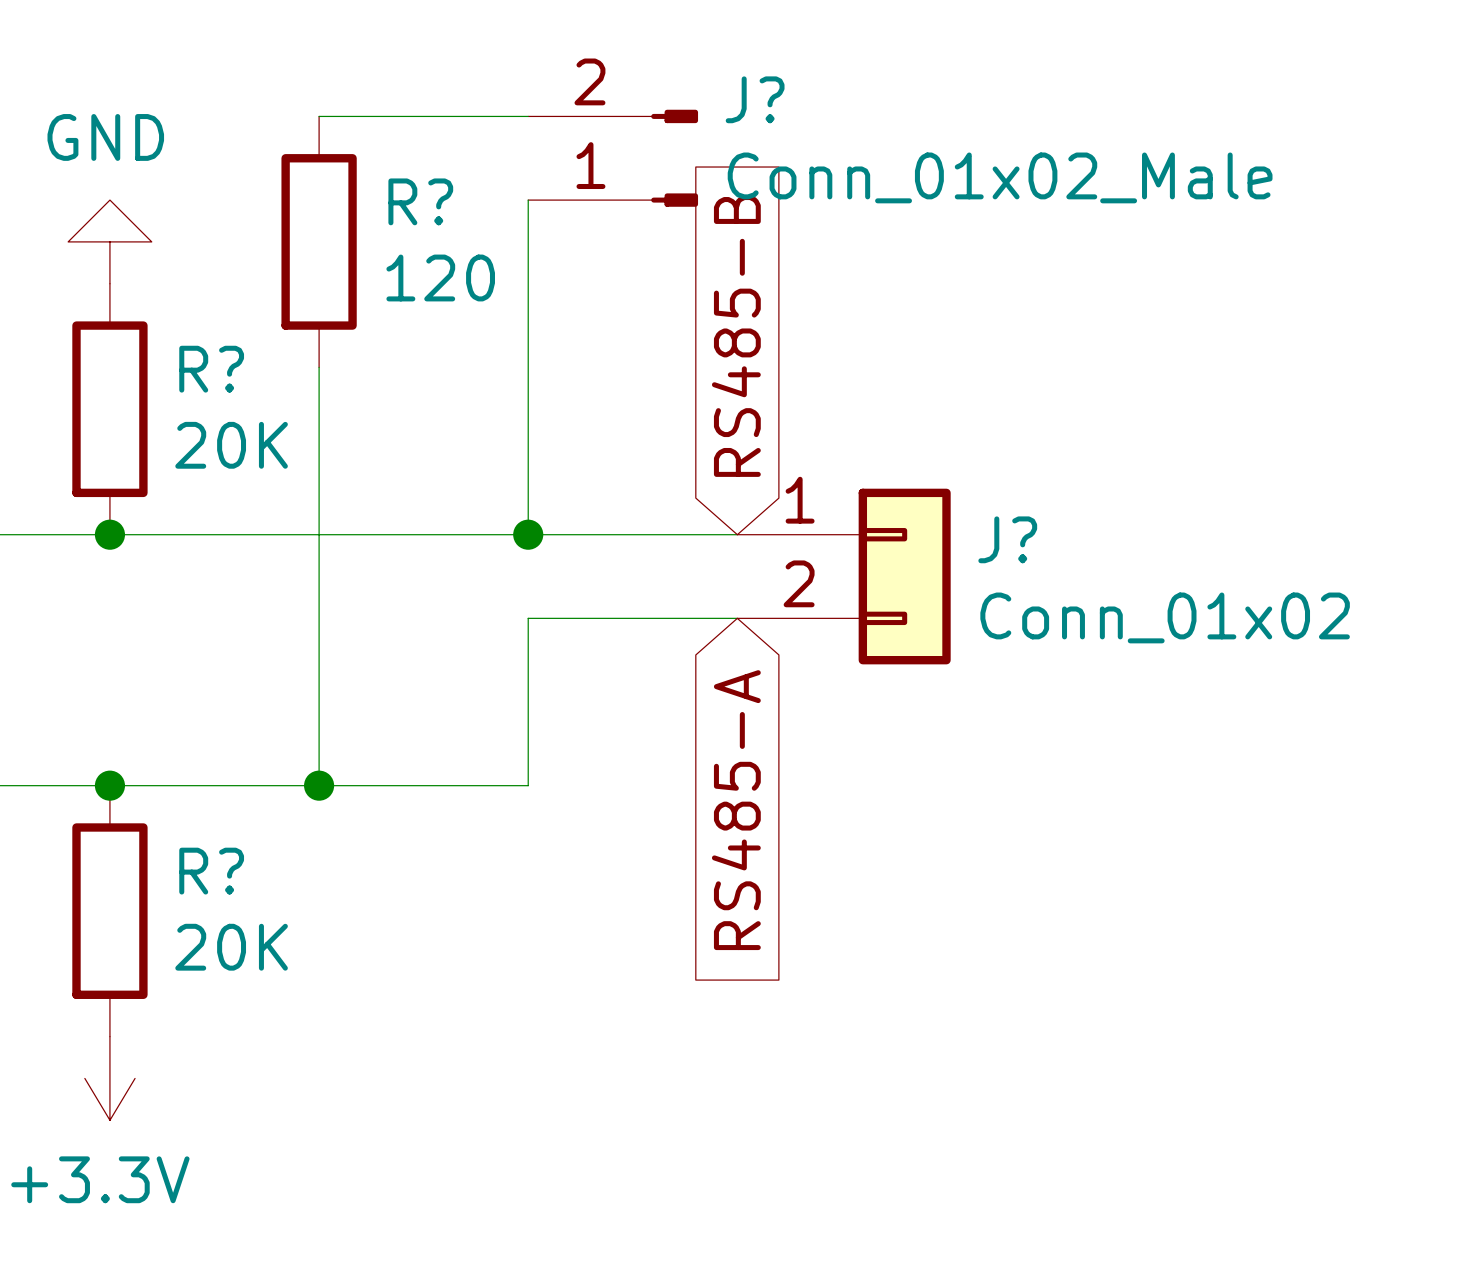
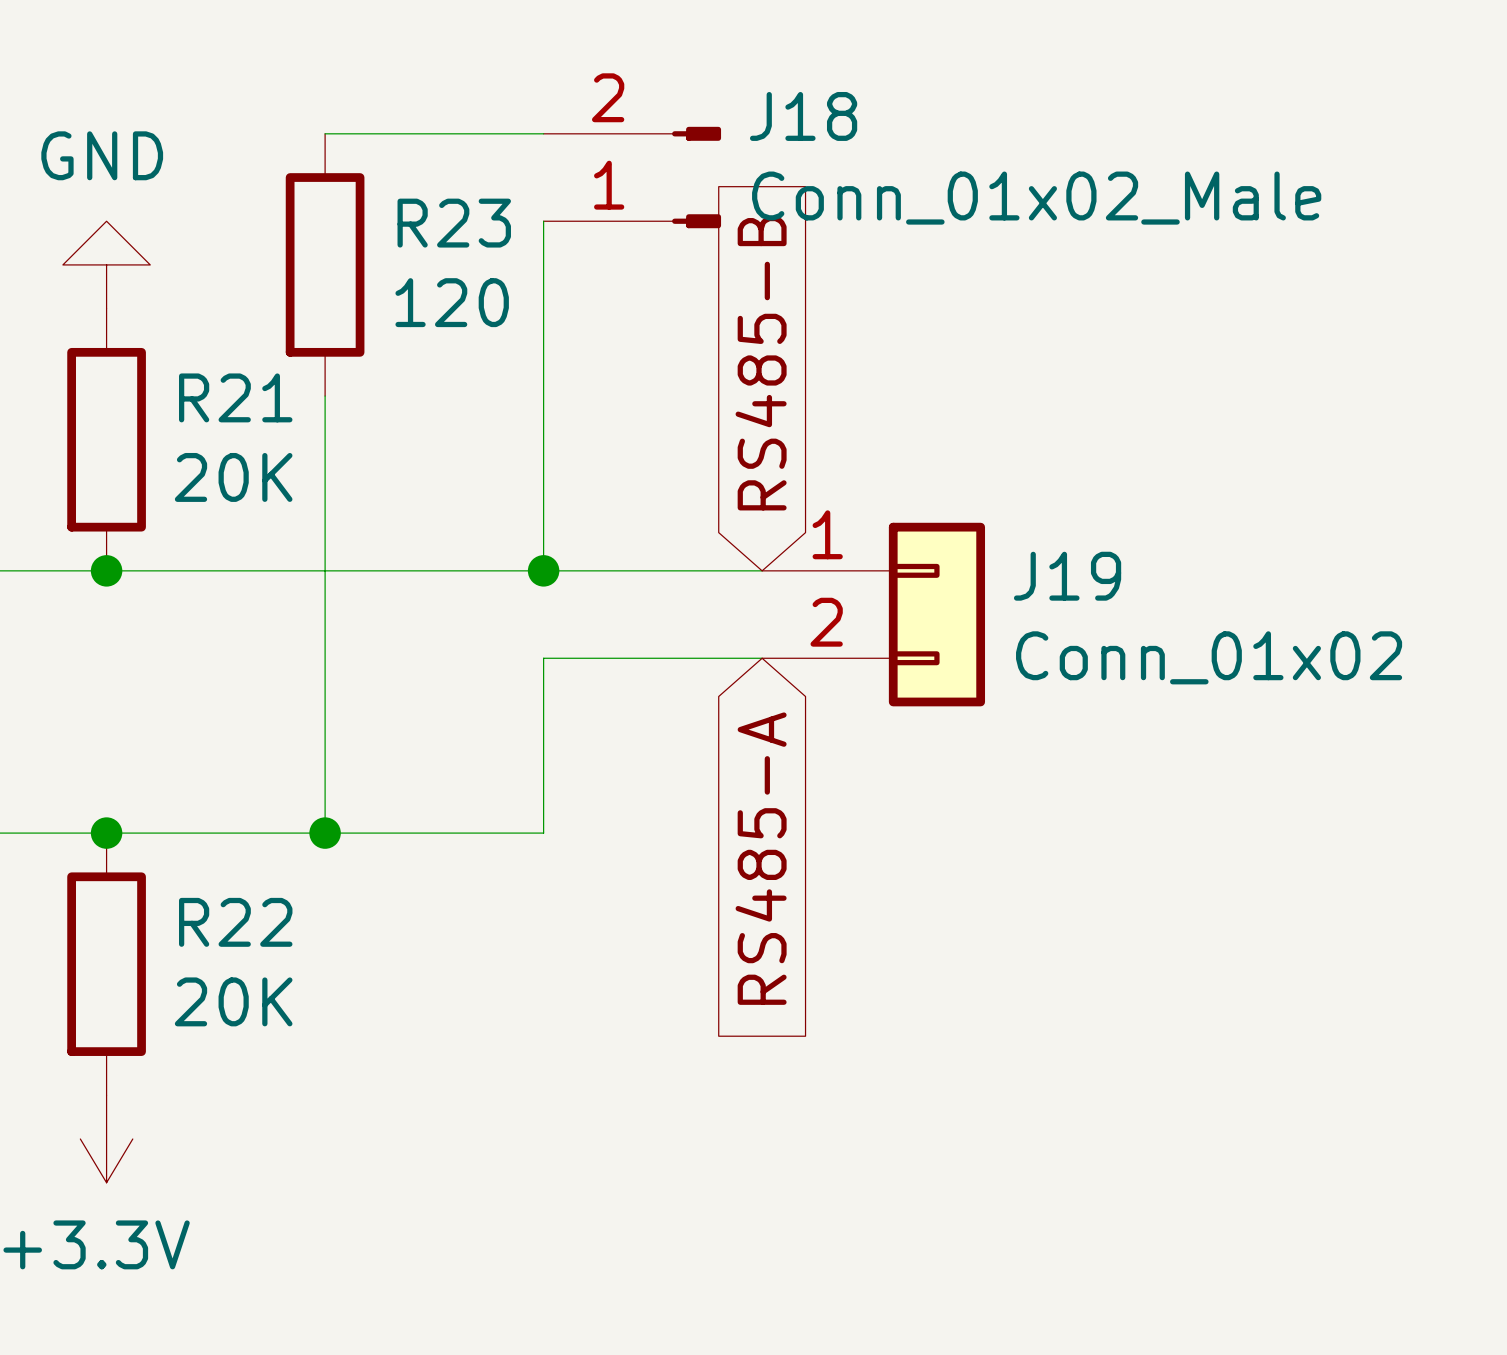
J? name: J? (755, 99) -> J18 (803, 116)
R? name: R? (420, 201) -> R23 (454, 223)
R? name: R? (211, 369) -> R21 (235, 397)
J? name: J? (1007, 539) -> J19 (1067, 576)
R? name: R? (211, 871) -> R22 (235, 922)

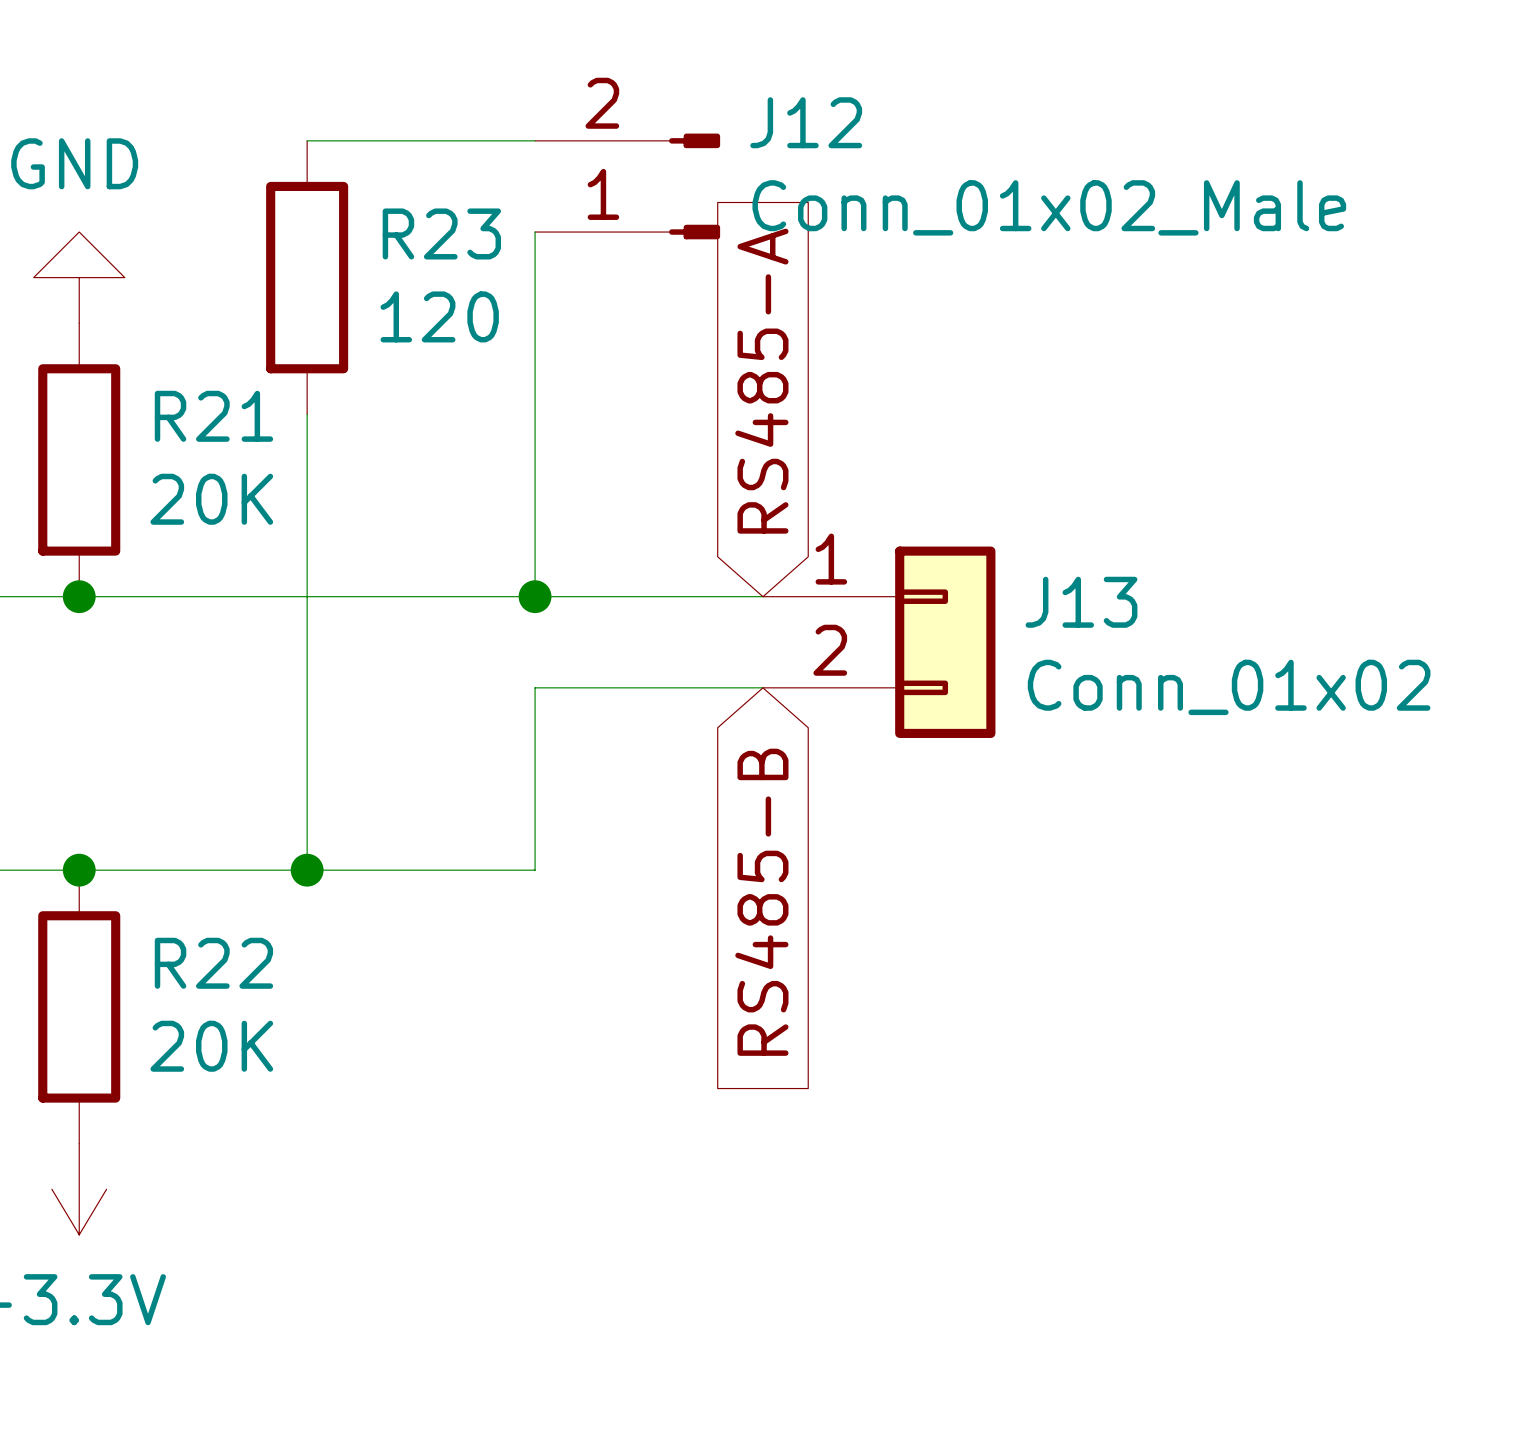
J18 name: J18 (803, 116) -> J12 (806, 122)
global label: RS485-B (761, 363) -> RS485-A (761, 381)
J19 name: J19 (1067, 576) -> J13 (1081, 602)
global label: RS485-A (761, 858) -> RS485-B (761, 902)

